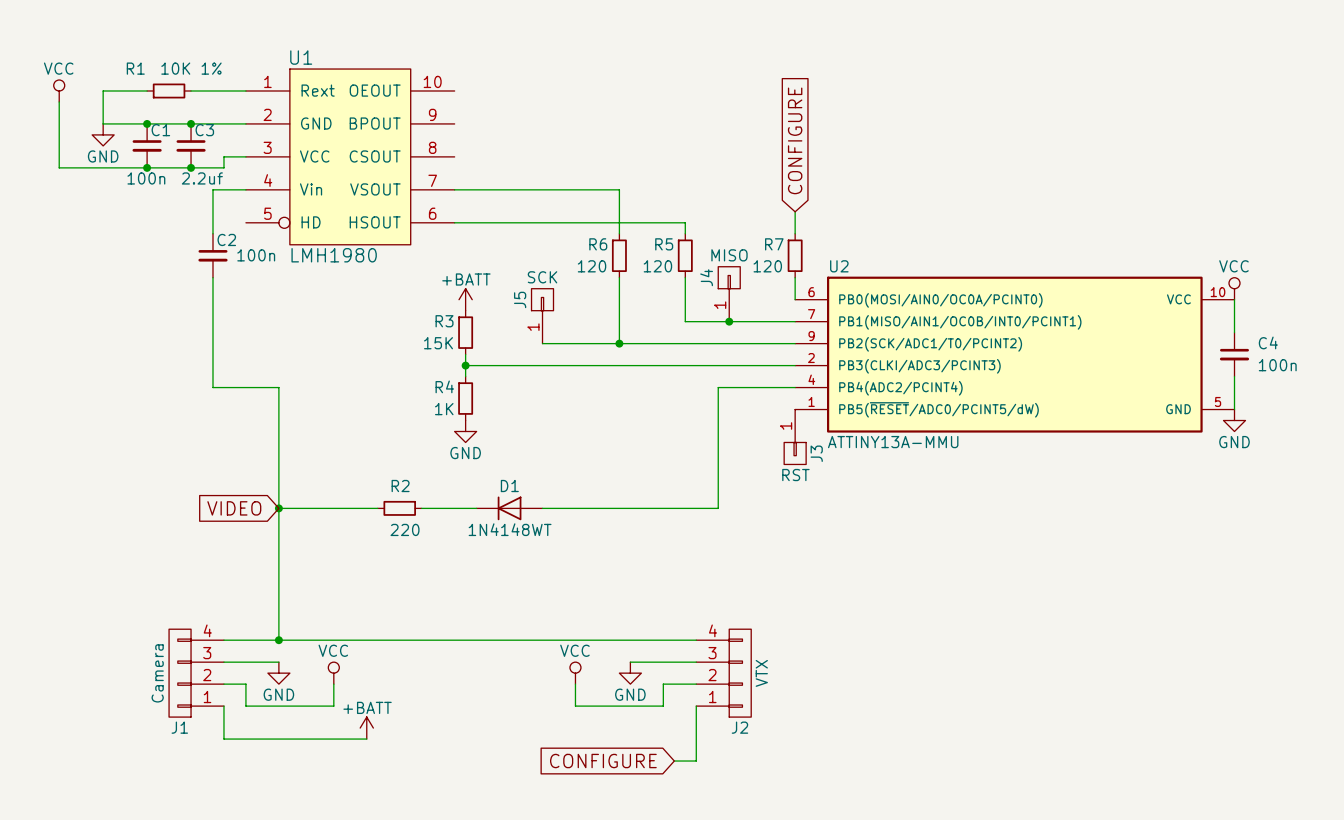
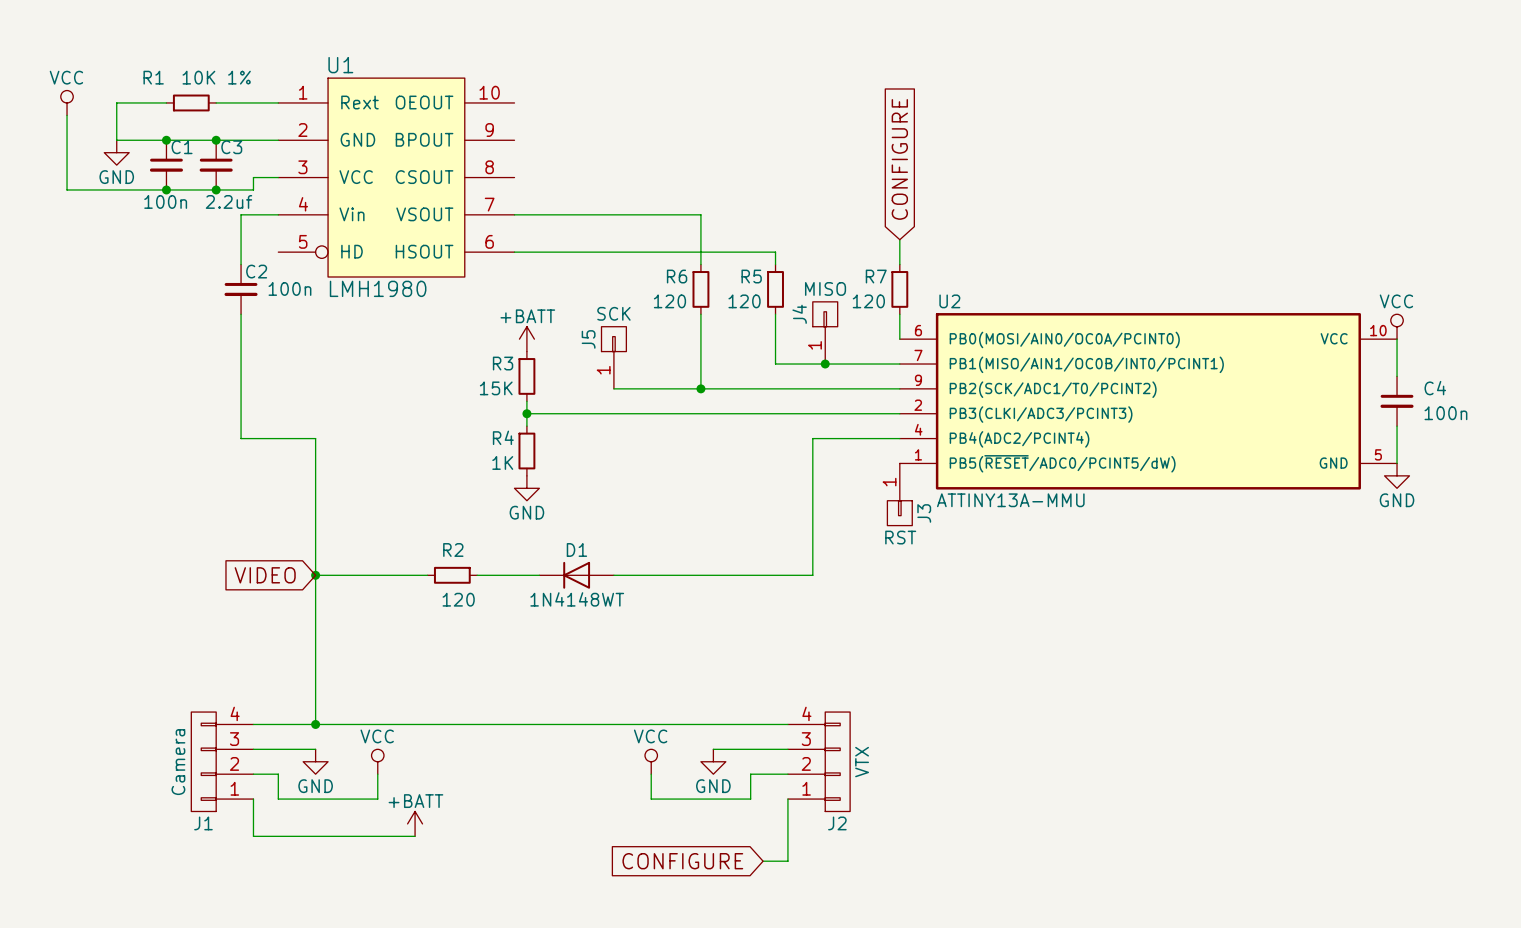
R2 value: 220 (405, 529) -> 120 (458, 599)

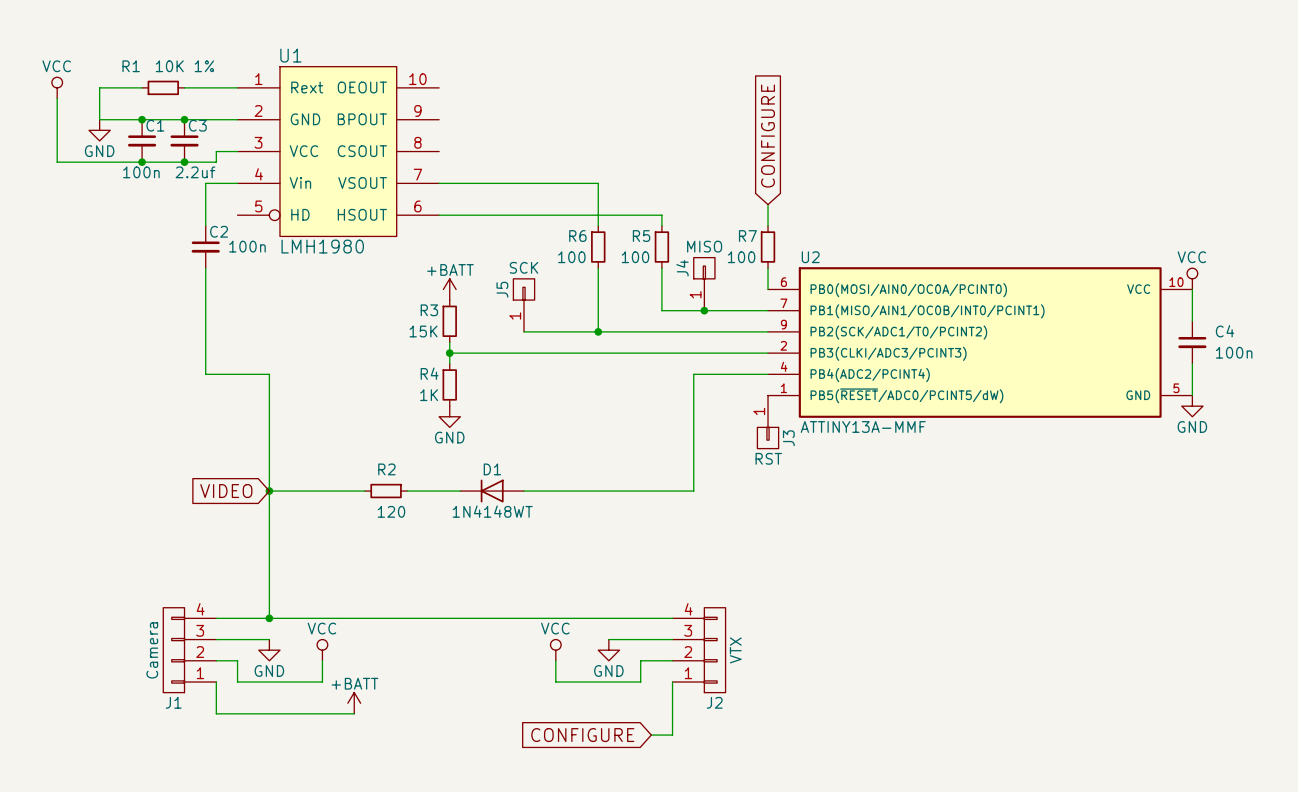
R6 value: 120 (669, 301) -> 100 (571, 257)
R5 value: 120 (744, 301) -> 100 (635, 257)
R7 value: 120 (868, 301) -> 100 (741, 257)
U2 value: ATTINY13A-MMU (1010, 500) -> ATTINY13A-MMF (863, 426)

